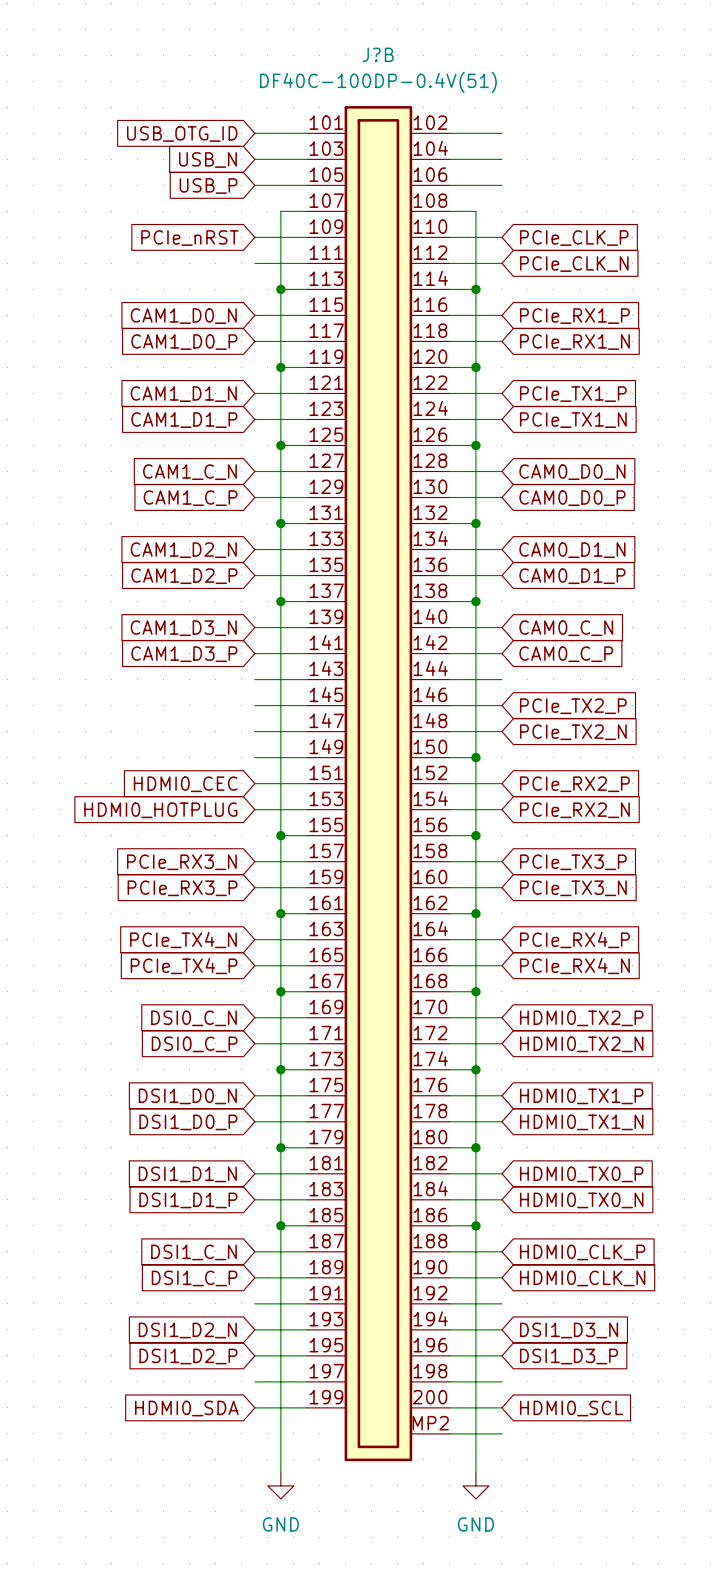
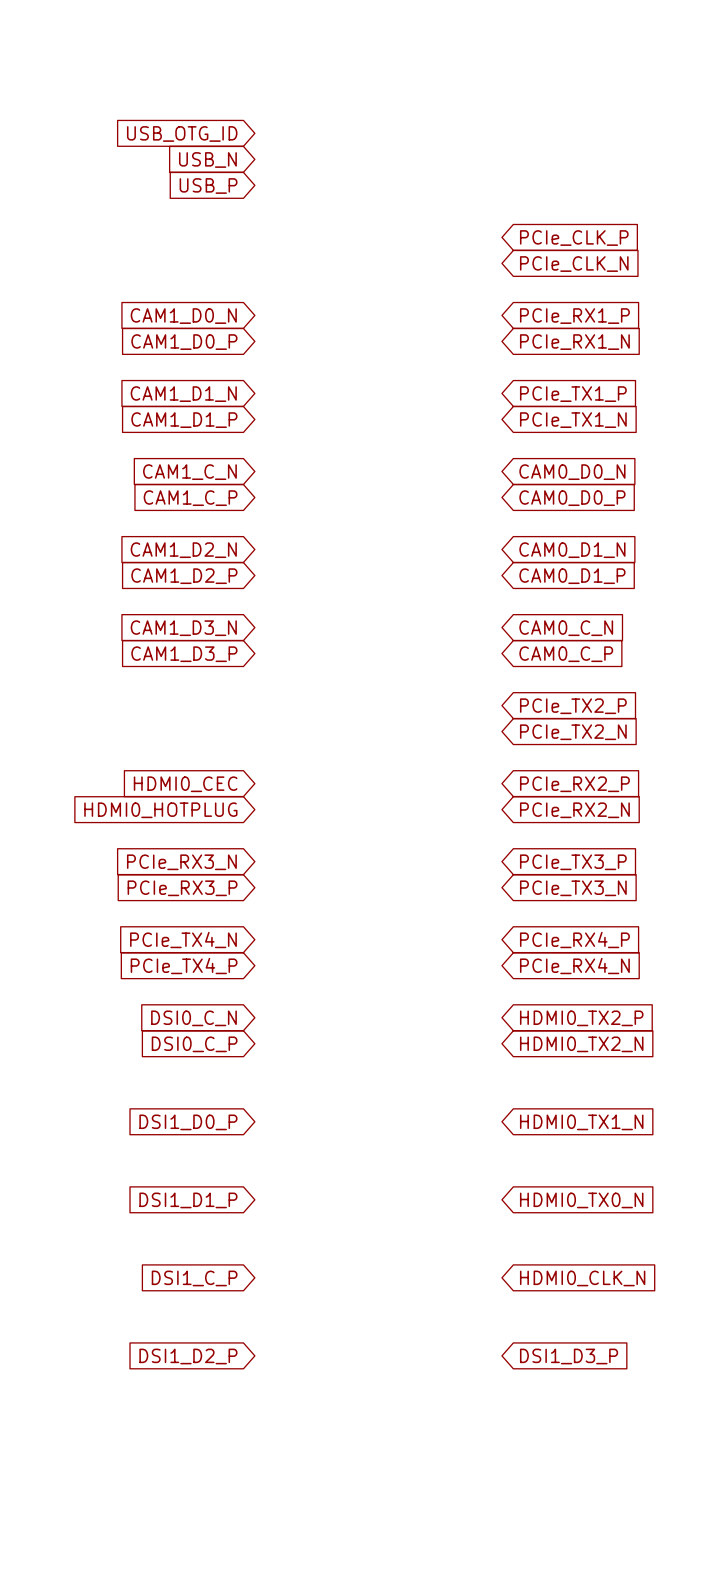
wire: (254, 133) (306, 133) -> none
wire: (449, 133) (501, 133) -> none
wire: (254, 159) (306, 159) -> none
wire: (449, 159) (501, 159) -> none
wire: (254, 185) (306, 185) -> none
wire: (449, 185) (501, 185) -> none
wire: (306, 211) (280, 211) (280, 1472) -> none
wire: (449, 211) (475, 211) (475, 1472) -> none
wire: (254, 237) (306, 237) -> none
wire: (449, 237) (501, 237) -> none
global label: PCIe_nRST (189, 238) -> none
wire: (254, 263) (306, 263) -> none
wire: (449, 263) (501, 263) -> none
wire: (280, 289) (306, 289) -> none
junction: (280, 289) -> none
wire: (449, 289) (475, 289) -> none
junction: (475, 289) -> none
wire: (254, 315) (306, 315) -> none
wire: (449, 315) (501, 315) -> none
wire: (254, 341) (306, 341) -> none
wire: (449, 341) (501, 341) -> none
wire: (280, 367) (306, 367) -> none
junction: (280, 367) -> none
wire: (449, 367) (475, 367) -> none
junction: (475, 367) -> none
wire: (254, 393) (306, 393) -> none
wire: (449, 393) (501, 393) -> none
wire: (254, 419) (306, 419) -> none
wire: (449, 419) (501, 419) -> none
wire: (280, 445) (306, 445) -> none
junction: (280, 445) -> none
wire: (449, 445) (475, 445) -> none
junction: (475, 445) -> none
wire: (254, 471) (306, 471) -> none
wire: (449, 471) (501, 471) -> none
wire: (254, 497) (306, 497) -> none
wire: (449, 497) (501, 497) -> none
wire: (280, 523) (306, 523) -> none
junction: (280, 523) -> none
wire: (449, 523) (475, 523) -> none
junction: (475, 523) -> none
wire: (254, 549) (306, 549) -> none
wire: (449, 549) (501, 549) -> none
wire: (254, 575) (306, 575) -> none
wire: (449, 575) (501, 575) -> none
wire: (280, 601) (306, 601) -> none
junction: (280, 601) -> none
wire: (449, 601) (475, 601) -> none
junction: (475, 601) -> none
wire: (254, 627) (306, 627) -> none
wire: (449, 627) (501, 627) -> none
wire: (254, 653) (306, 653) -> none
wire: (449, 653) (501, 653) -> none
wire: (254, 679) (306, 679) -> none
wire: (449, 679) (501, 679) -> none
wire: (254, 705) (306, 705) -> none
wire: (449, 705) (501, 705) -> none
wire: (254, 731) (306, 731) -> none
wire: (449, 731) (501, 731) -> none
wire: (254, 757) (306, 757) -> none
wire: (449, 757) (475, 757) -> none
junction: (475, 757) -> none
wire: (254, 783) (306, 783) -> none
J?B: (378, 783) -> none
wire: (449, 783) (501, 783) -> none
wire: (254, 809) (306, 809) -> none
wire: (449, 809) (501, 809) -> none
wire: (280, 835) (306, 835) -> none
junction: (280, 835) -> none
wire: (449, 835) (475, 835) -> none
junction: (475, 835) -> none
wire: (254, 861) (306, 861) -> none
wire: (449, 861) (501, 861) -> none
wire: (254, 887) (306, 887) -> none
wire: (449, 887) (501, 887) -> none
wire: (280, 913) (306, 913) -> none
junction: (280, 913) -> none
wire: (449, 913) (475, 913) -> none
junction: (475, 913) -> none
wire: (254, 939) (306, 939) -> none
wire: (449, 939) (501, 939) -> none
wire: (254, 965) (306, 965) -> none
wire: (449, 965) (501, 965) -> none
wire: (280, 991) (306, 991) -> none
junction: (280, 991) -> none
wire: (449, 991) (475, 991) -> none
junction: (475, 991) -> none
wire: (254, 1017) (306, 1017) -> none
wire: (449, 1017) (501, 1017) -> none
wire: (254, 1043) (306, 1043) -> none
wire: (449, 1043) (501, 1043) -> none
wire: (280, 1069) (306, 1069) -> none
junction: (280, 1069) -> none
wire: (449, 1069) (475, 1069) -> none
junction: (475, 1069) -> none
wire: (254, 1095) (306, 1095) -> none
wire: (449, 1095) (501, 1095) -> none
global label: DSI1_D0_N (187, 1096) -> none
global label: HDMI0_TX1_P (581, 1096) -> none
wire: (254, 1121) (306, 1121) -> none
wire: (449, 1121) (501, 1121) -> none
wire: (280, 1147) (306, 1147) -> none
junction: (280, 1147) -> none
wire: (449, 1147) (475, 1147) -> none
junction: (475, 1147) -> none
wire: (254, 1173) (306, 1173) -> none
wire: (449, 1173) (501, 1173) -> none
global label: DSI1_D1_N (187, 1174) -> none
global label: HDMI0_TX0_P (581, 1174) -> none
wire: (254, 1199) (306, 1199) -> none
wire: (449, 1199) (501, 1199) -> none
wire: (280, 1225) (306, 1225) -> none
junction: (280, 1225) -> none
wire: (449, 1225) (475, 1225) -> none
junction: (475, 1225) -> none
wire: (254, 1251) (306, 1251) -> none
wire: (449, 1251) (501, 1251) -> none
global label: DSI1_C_N (193, 1252) -> none
global label: HDMI0_CLK_P (582, 1252) -> none
wire: (254, 1277) (306, 1277) -> none
wire: (449, 1277) (501, 1277) -> none
wire: (254, 1303) (306, 1303) -> none
wire: (449, 1303) (501, 1303) -> none
wire: (254, 1329) (306, 1329) -> none
wire: (449, 1329) (501, 1329) -> none
global label: DSI1_D2_N (187, 1330) -> none
global label: DSI1_D3_N (569, 1330) -> none
wire: (254, 1355) (306, 1355) -> none
wire: (449, 1355) (501, 1355) -> none
wire: (254, 1381) (306, 1381) -> none
wire: (449, 1381) (501, 1381) -> none
wire: (254, 1407) (306, 1407) -> none
wire: (449, 1407) (501, 1407) -> none
global label: HDMI0_SDA (186, 1408) -> none
global label: HDMI0_SCL (571, 1408) -> none
wire: (449, 1433) (501, 1433) -> none
power symbol: GND (280, 1485) -> none
power symbol: GND (475, 1485) -> none

